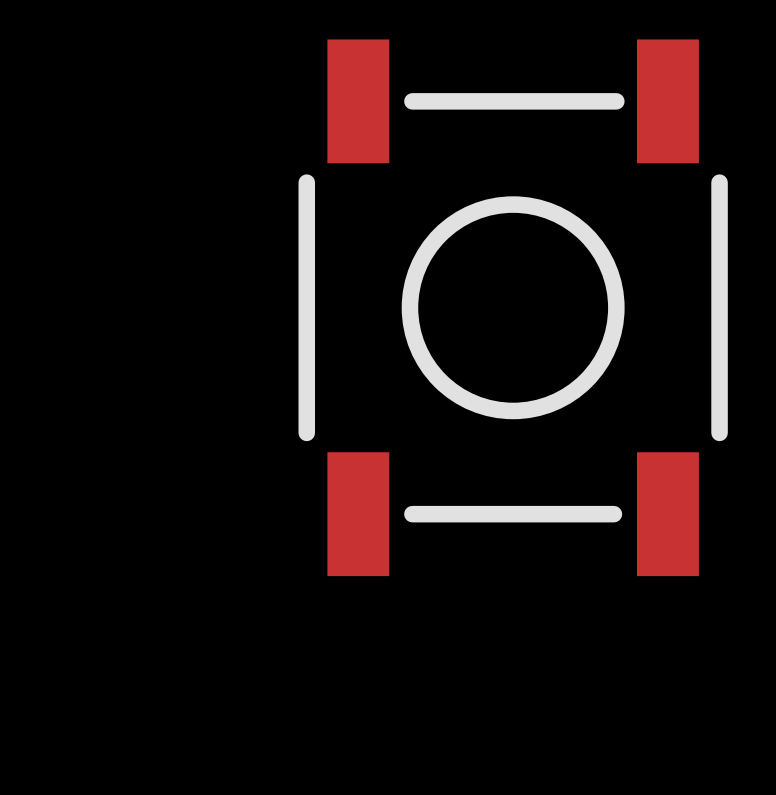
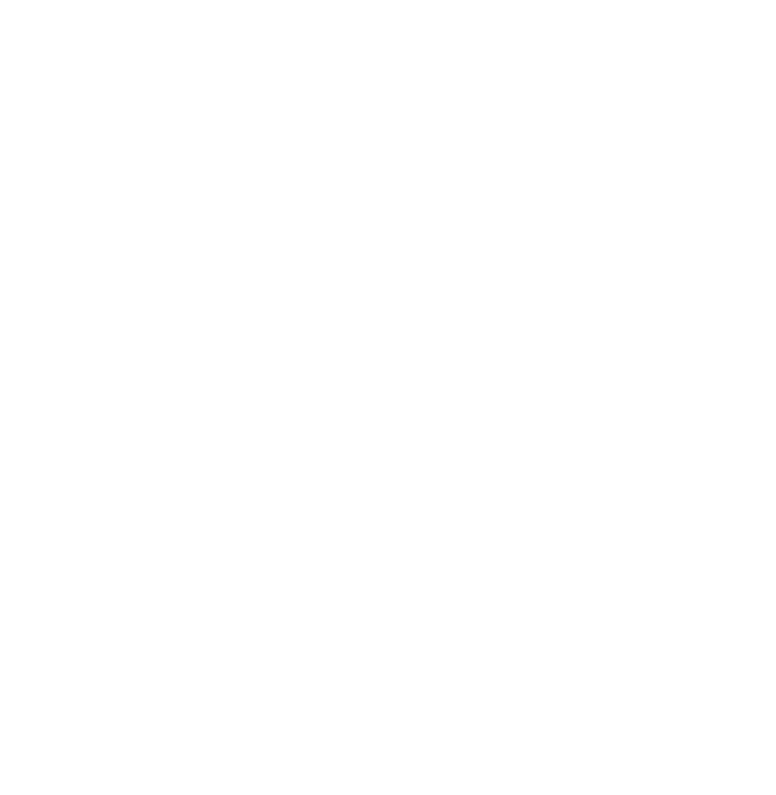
part: (513, 307) -> none

